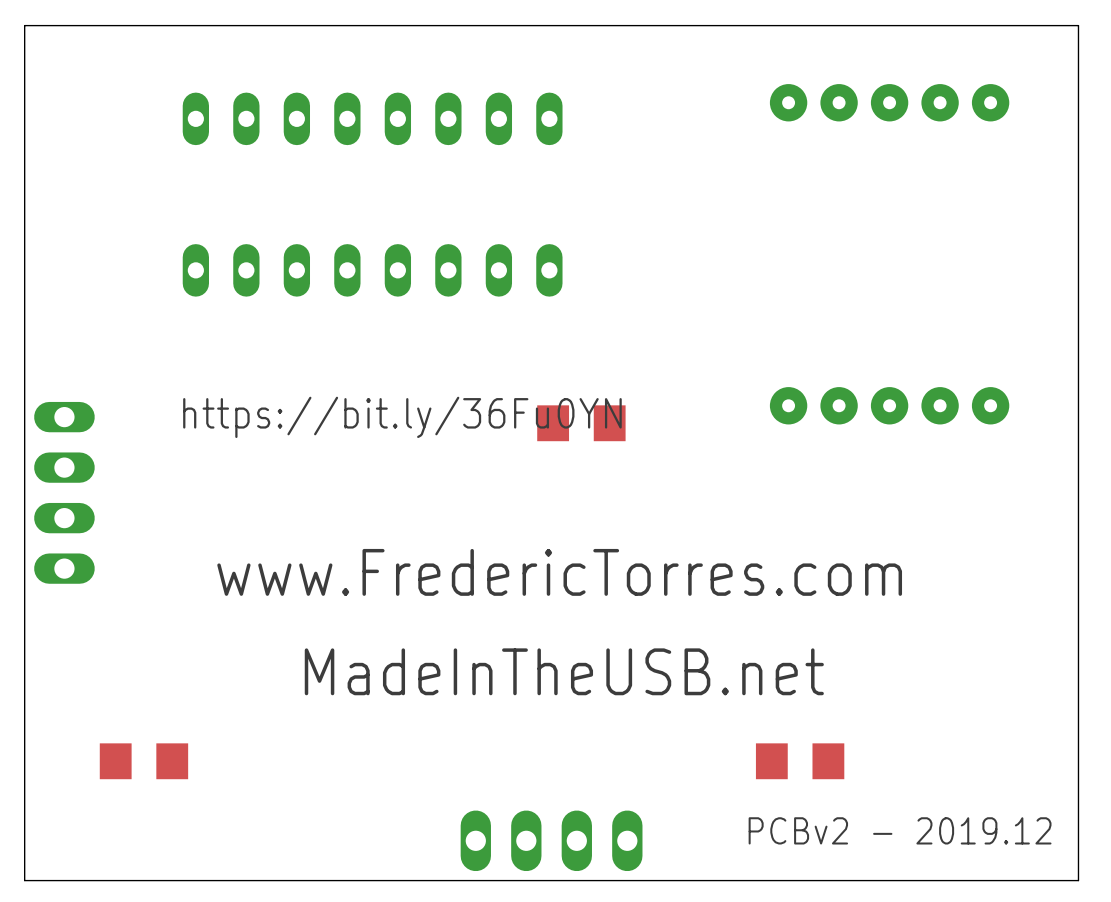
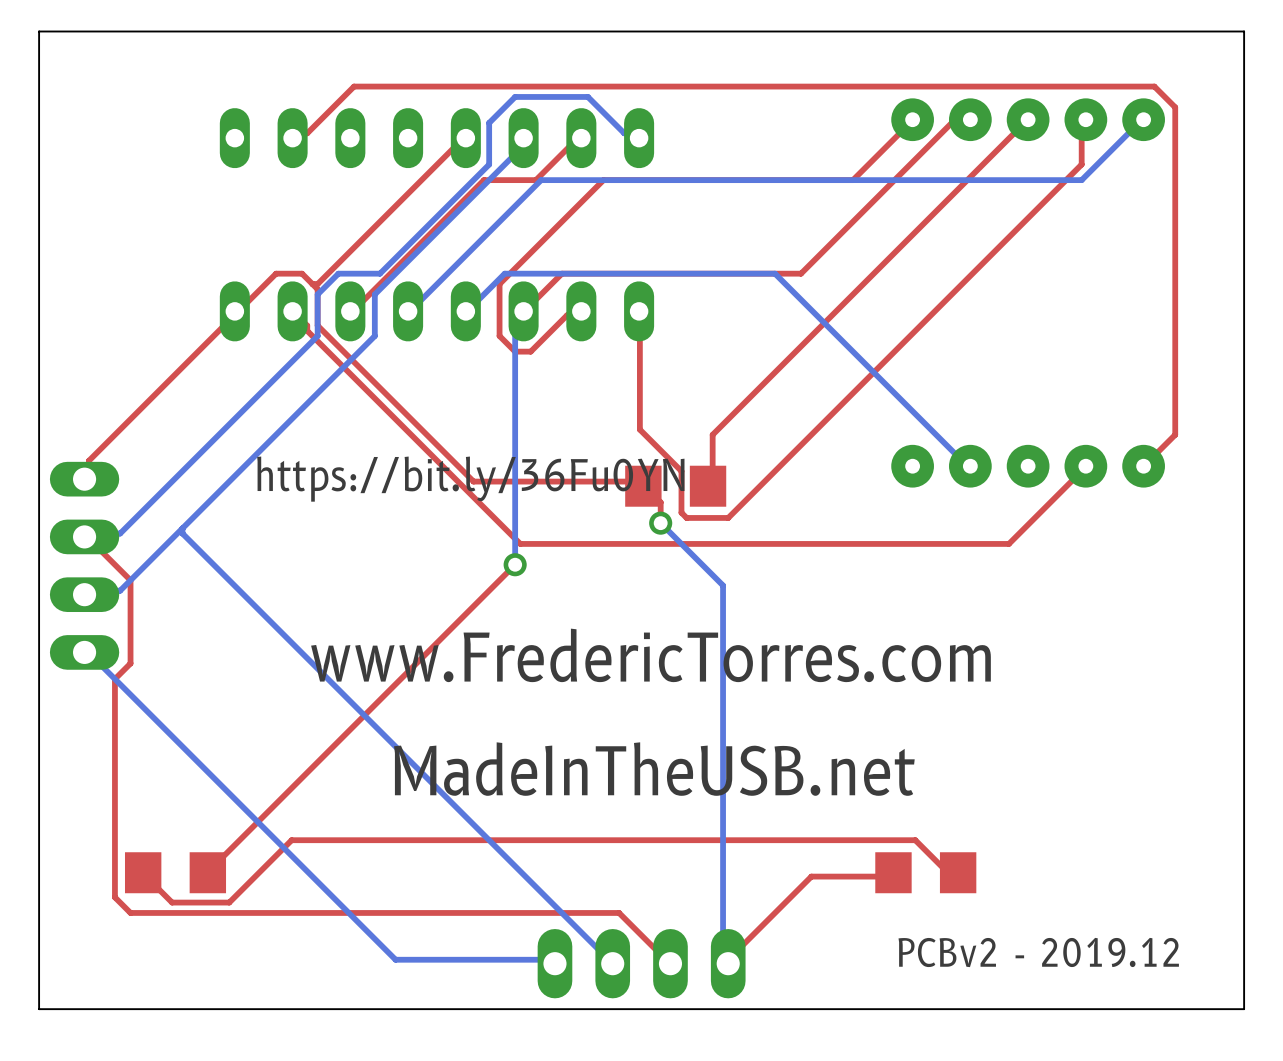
top track: none -> (912, 119) (852, 180) (603, 180) (499, 284) (499, 336) (515, 351) (530, 351) (567, 315) (577, 315) (581, 311)
top track: none -> (970, 119) (967, 122) (951, 122) (801, 273) (561, 273) (523, 311)
top track: none -> (1028, 119) (712, 434) (712, 481) (708, 486)
top track: none -> (1085, 119) (1081, 122) (1081, 164) (728, 517) (686, 517) (681, 512) (681, 471) (639, 429) (639, 311)
bottom track: none -> (1143, 119) (1081, 180) (541, 180) (408, 311)
top track: none -> (292, 138) (296, 133) (307, 133) (354, 86) (1154, 86) (1175, 107) (1175, 434) (1143, 466)
top track: none -> (465, 138) (463, 138) (317, 284) (312, 284)
bottom track: none -> (523, 138) (520, 138) (520, 148) (374, 294) (374, 336) (120, 590) (88, 590) (84, 594)
top track: none -> (581, 138) (577, 138) (535, 180) (483, 180) (354, 310) (350, 311)
bottom track: none -> (639, 138) (634, 133) (624, 133) (587, 96) (515, 96) (489, 122) (489, 164) (380, 273) (338, 273) (317, 294) (317, 336) (120, 533) (88, 533) (84, 536)
top track: none -> (292, 311) (307, 325) (307, 330) (520, 543) (1008, 543) (1085, 466)
bottom track: none -> (465, 311) (504, 273) (775, 273) (967, 465) (970, 466)
bottom track: none -> (523, 311) (515, 320) (515, 564)
top track: none -> (84, 479) (88, 476) (88, 460) (234, 315) (234, 311) (239, 310) (276, 273) (302, 273) (317, 289) (317, 325) (473, 481) (639, 481) (660, 502) (660, 523)
bottom track: none -> (660, 523) (723, 585) (723, 959) (728, 963)
via: none -> (660, 523)
bottom track: none -> (182, 528) (182, 533) (612, 963)
top track: none -> (84, 536) (88, 538) (130, 580) (130, 663) (114, 679) (114, 897) (130, 912) (619, 912) (670, 963)
top track: none -> (515, 564) (207, 872)
via: none -> (515, 564)
bottom track: none -> (84, 652) (88, 653) (395, 959) (551, 959) (554, 963)
top track: none -> (893, 872) (889, 876) (811, 876) (728, 959) (728, 963)
top track: none -> (958, 872) (946, 871) (915, 840) (291, 840) (229, 902) (172, 902) (143, 872)

